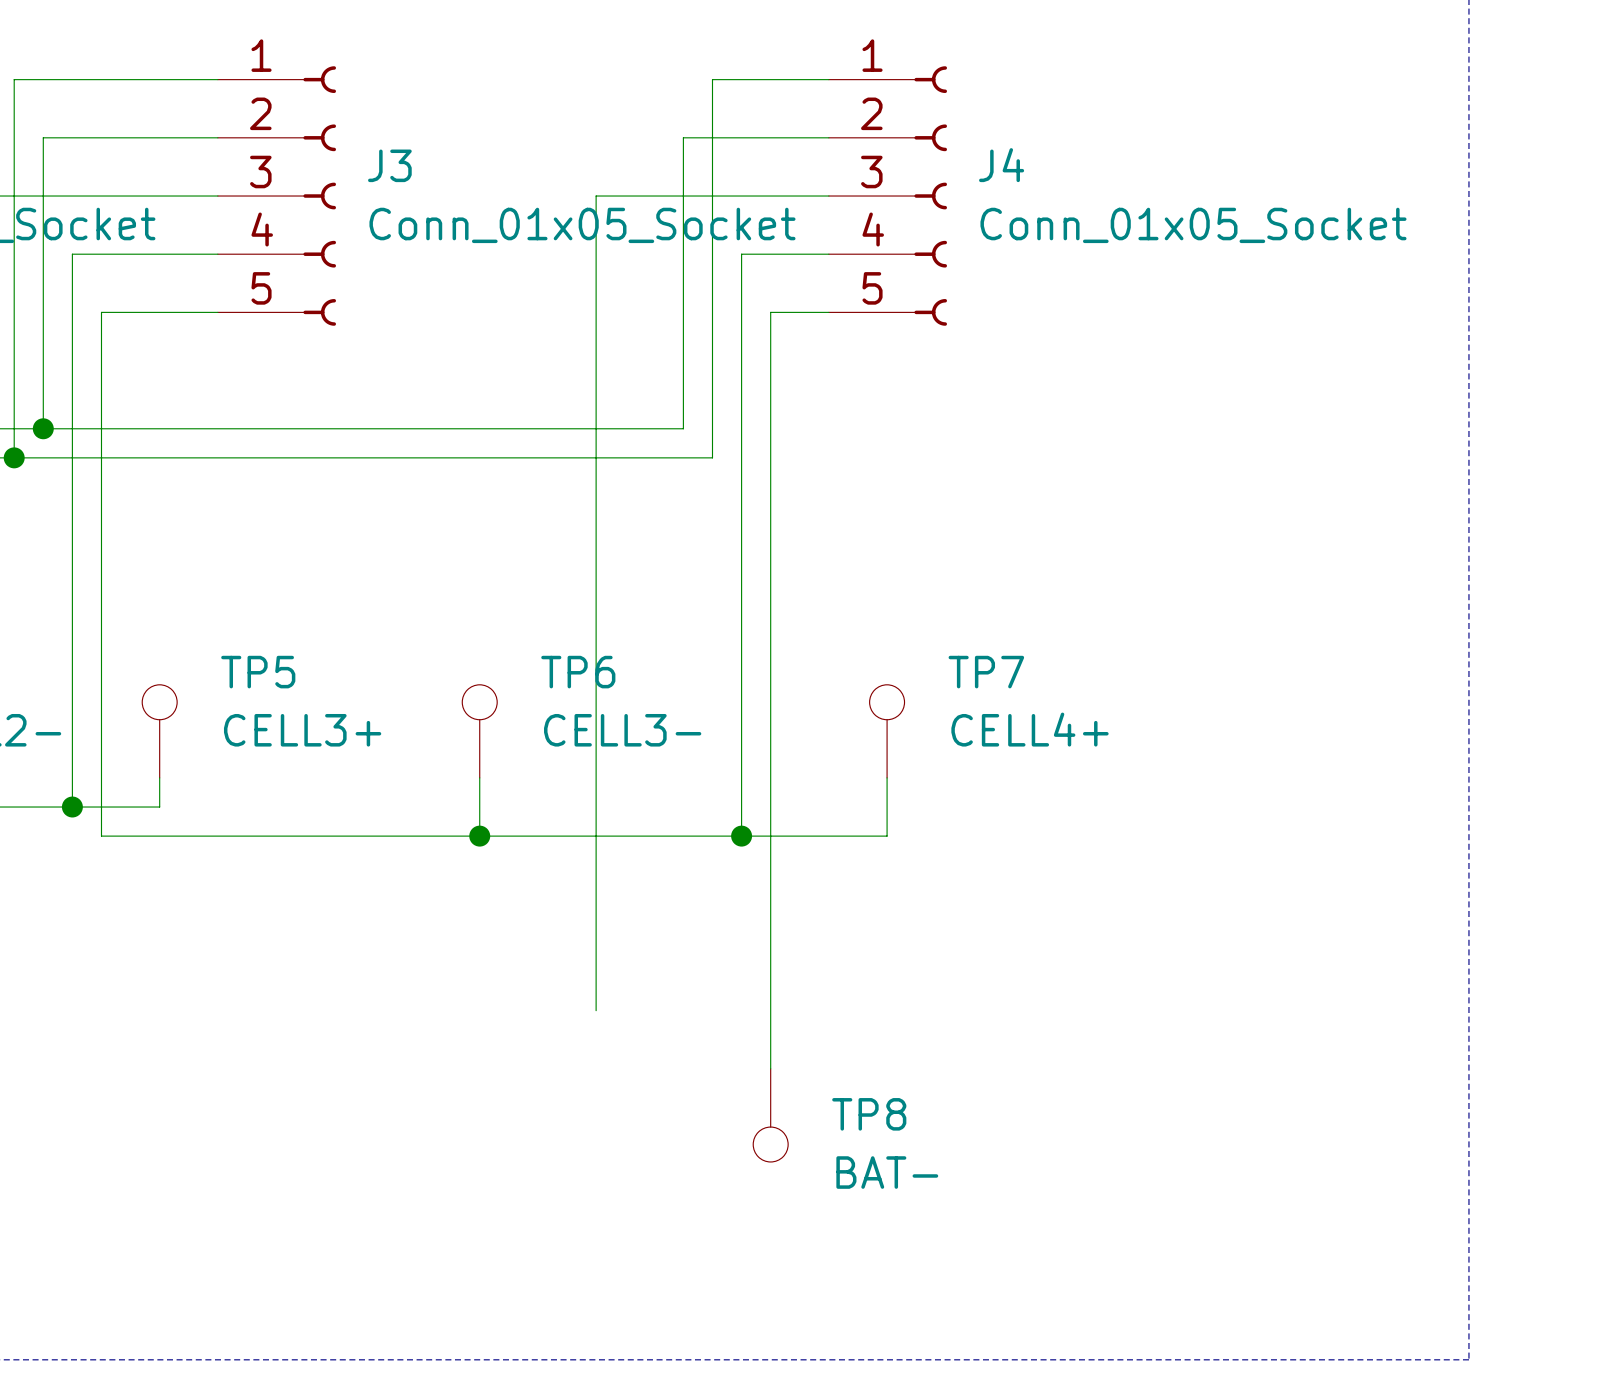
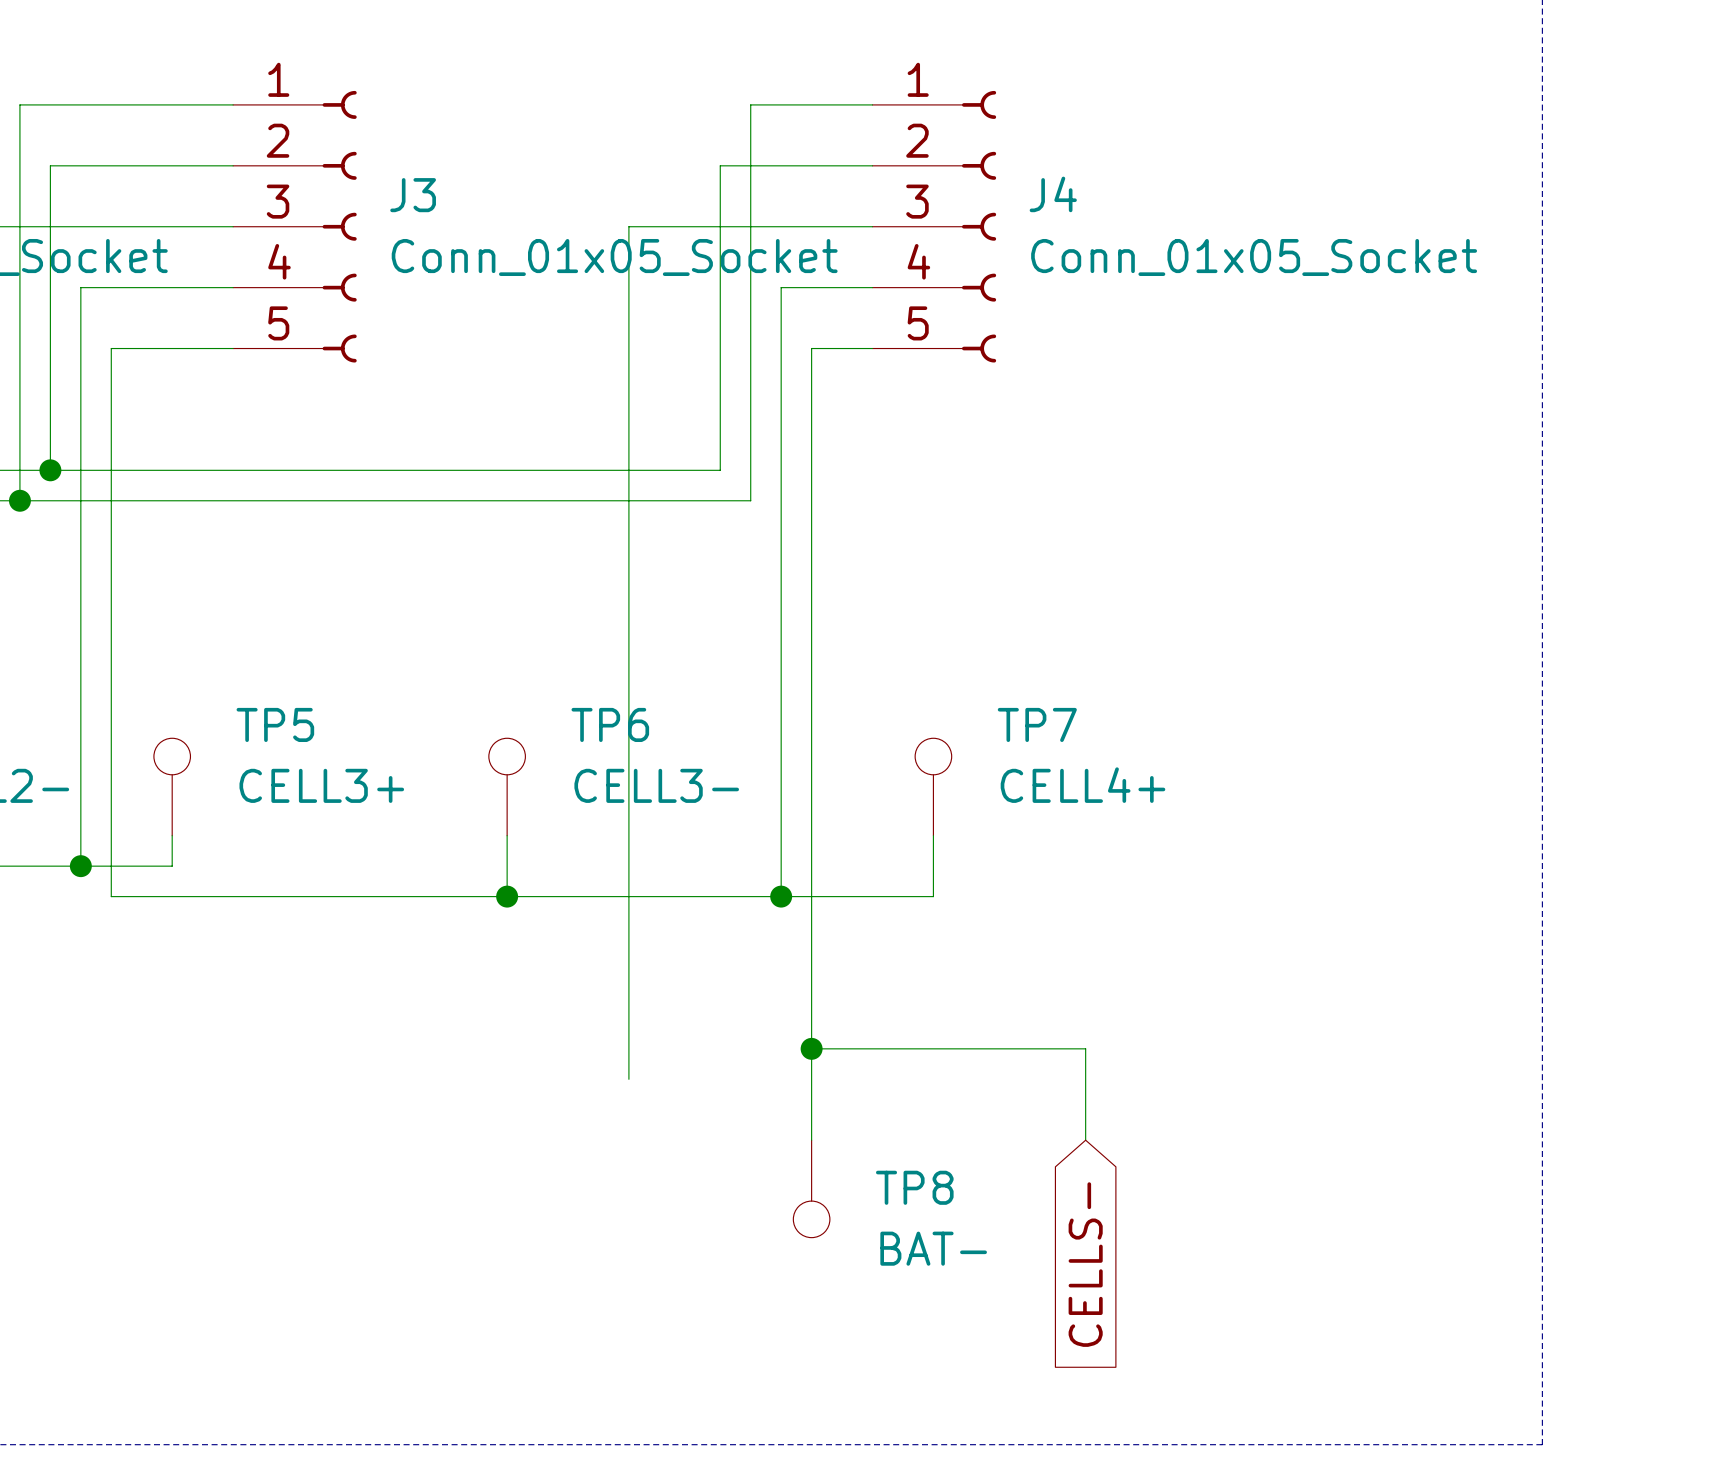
wire: none -> (811, 1048) (1085, 1048) (1085, 1140)
junction: none -> (811, 1048)
global label: none -> CELLS- (1085, 1264)

